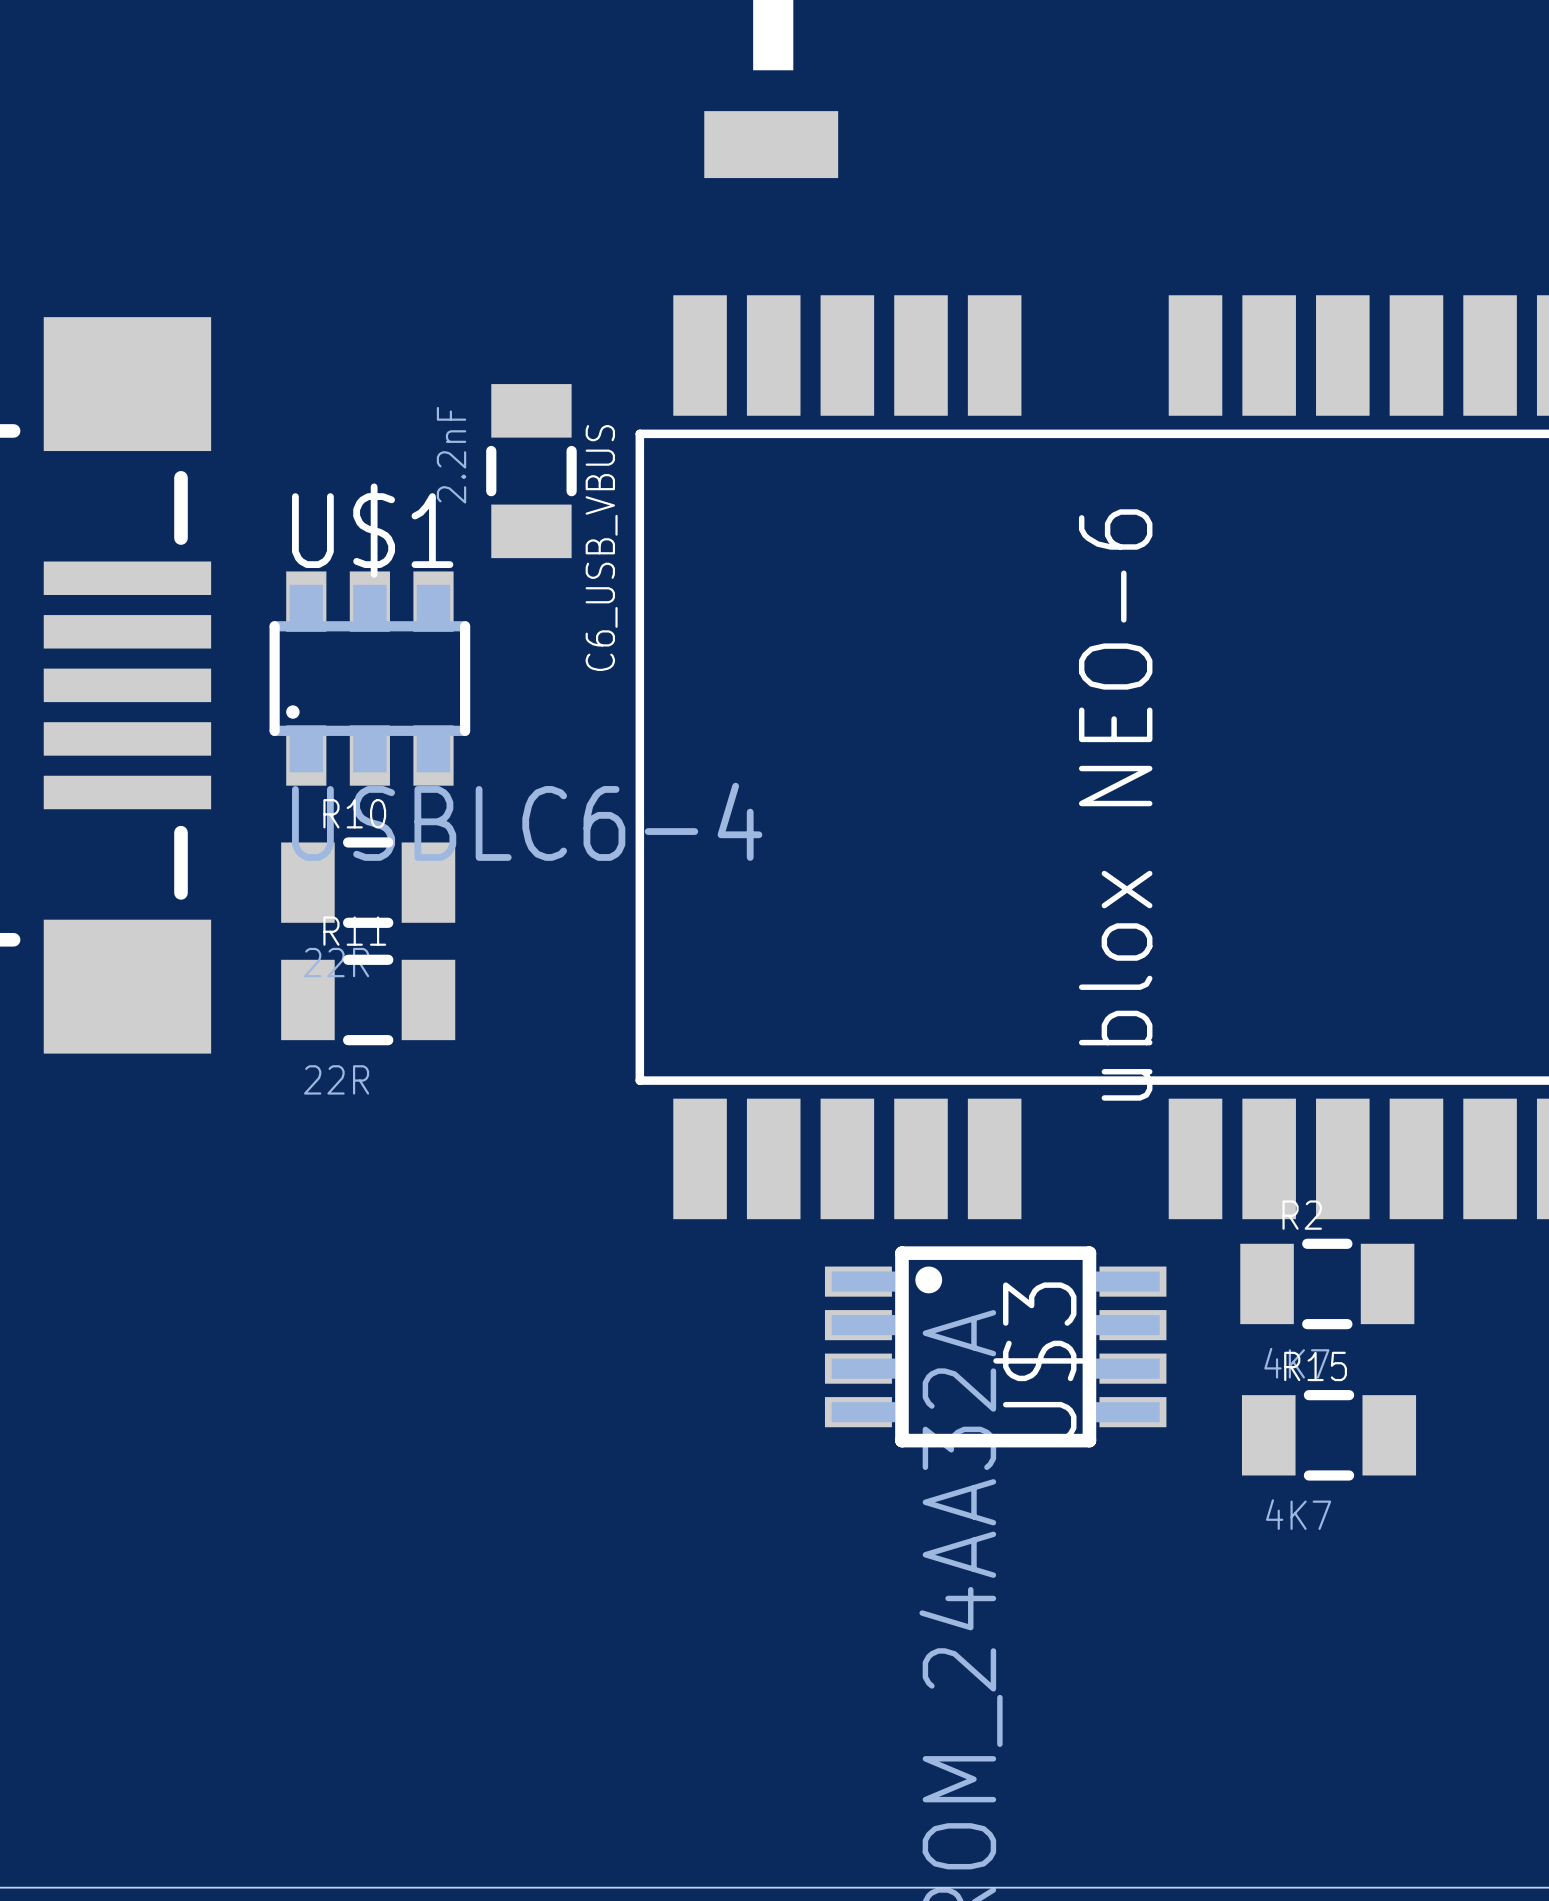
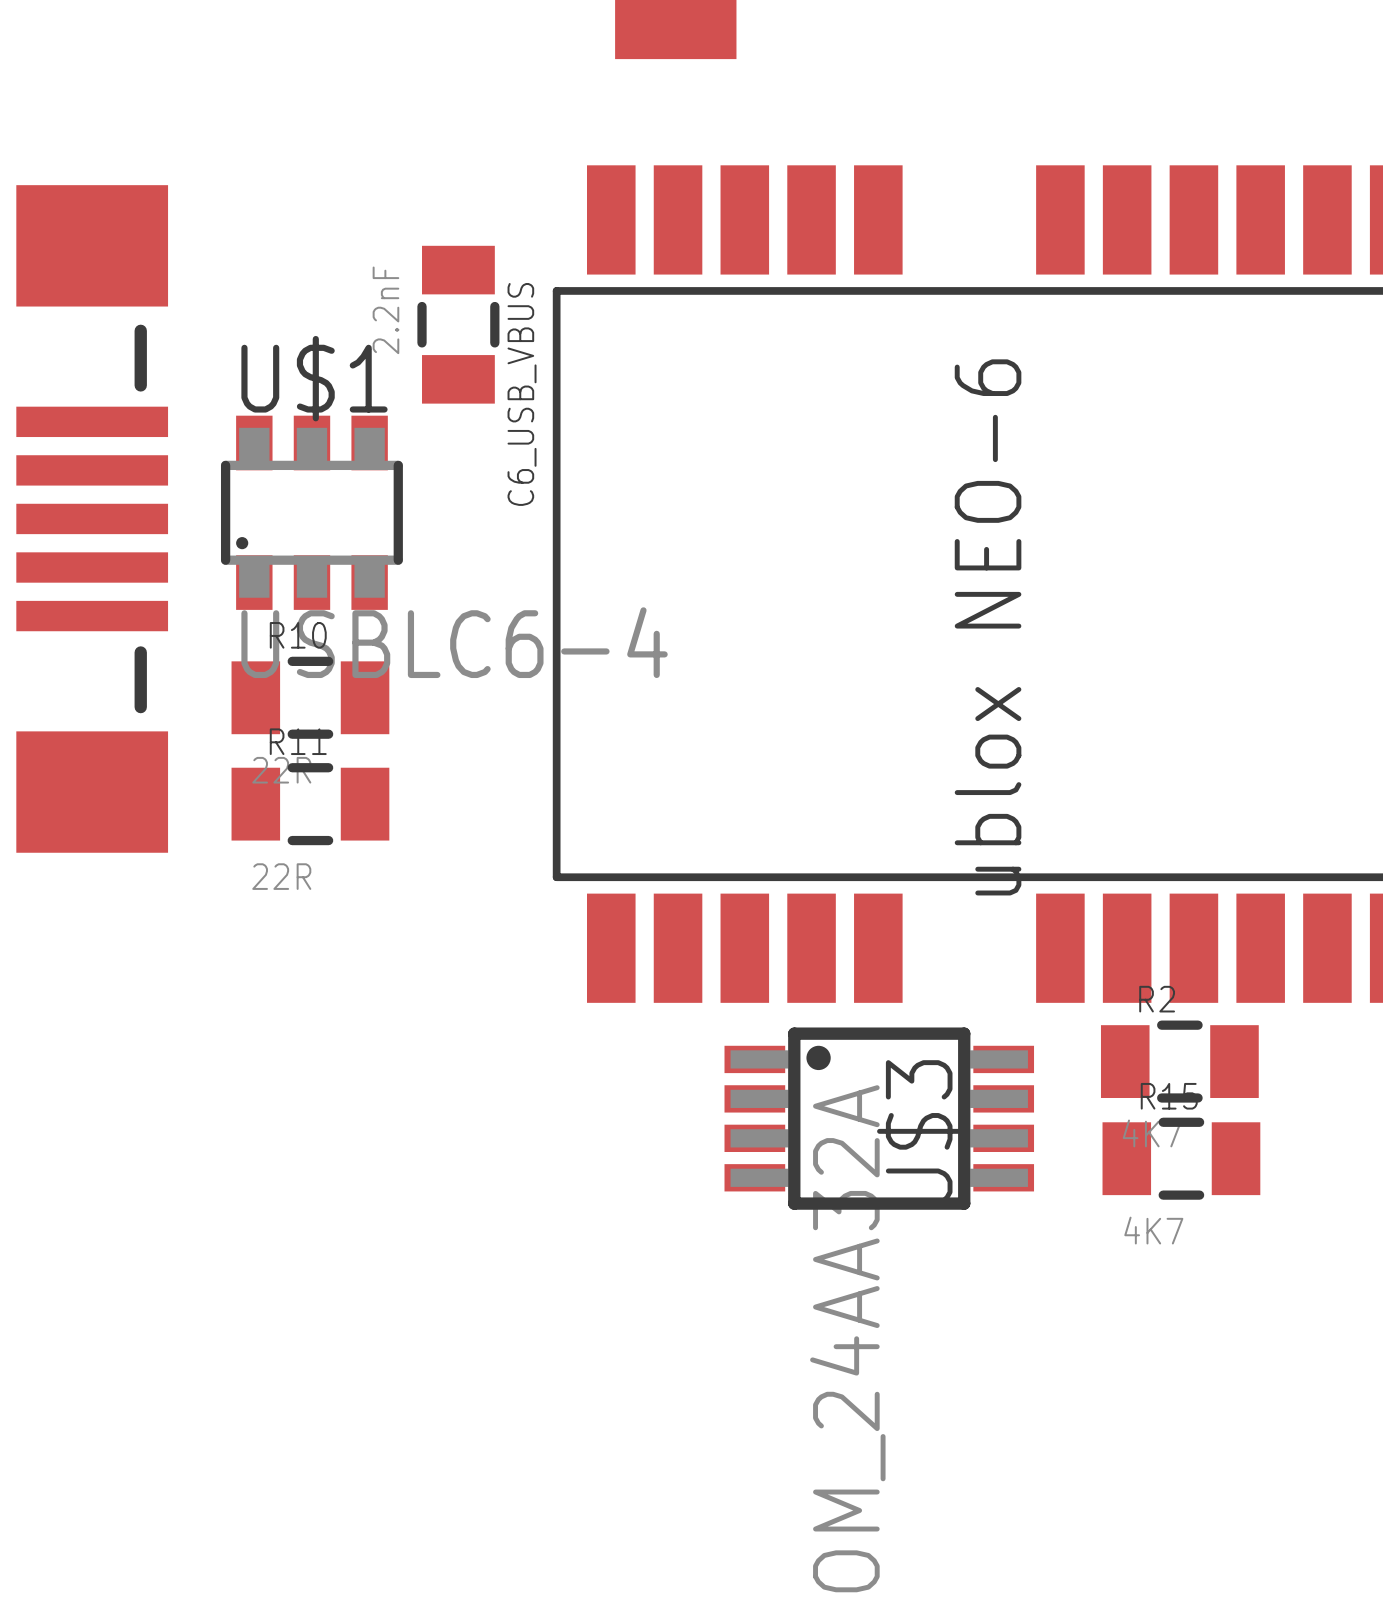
R15 position: (1329, 1435) -> (1181, 1158)

